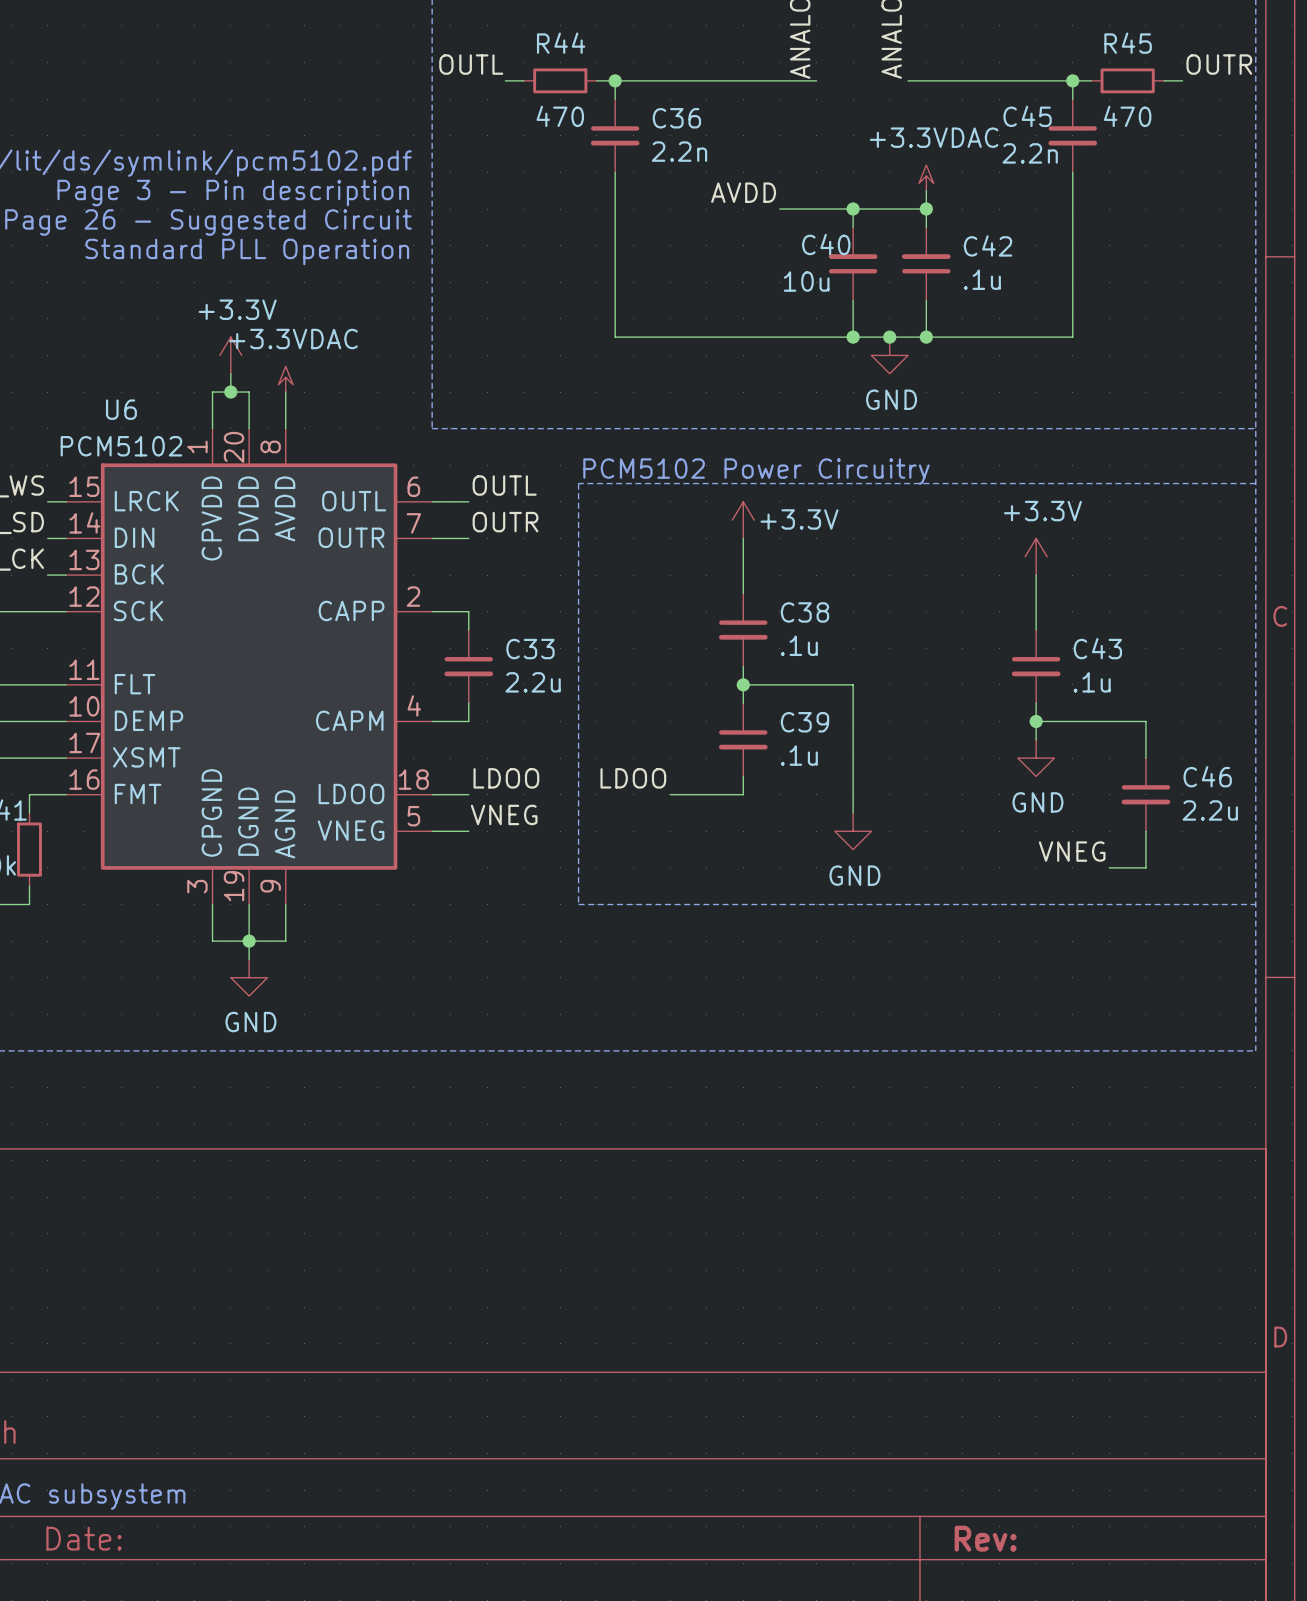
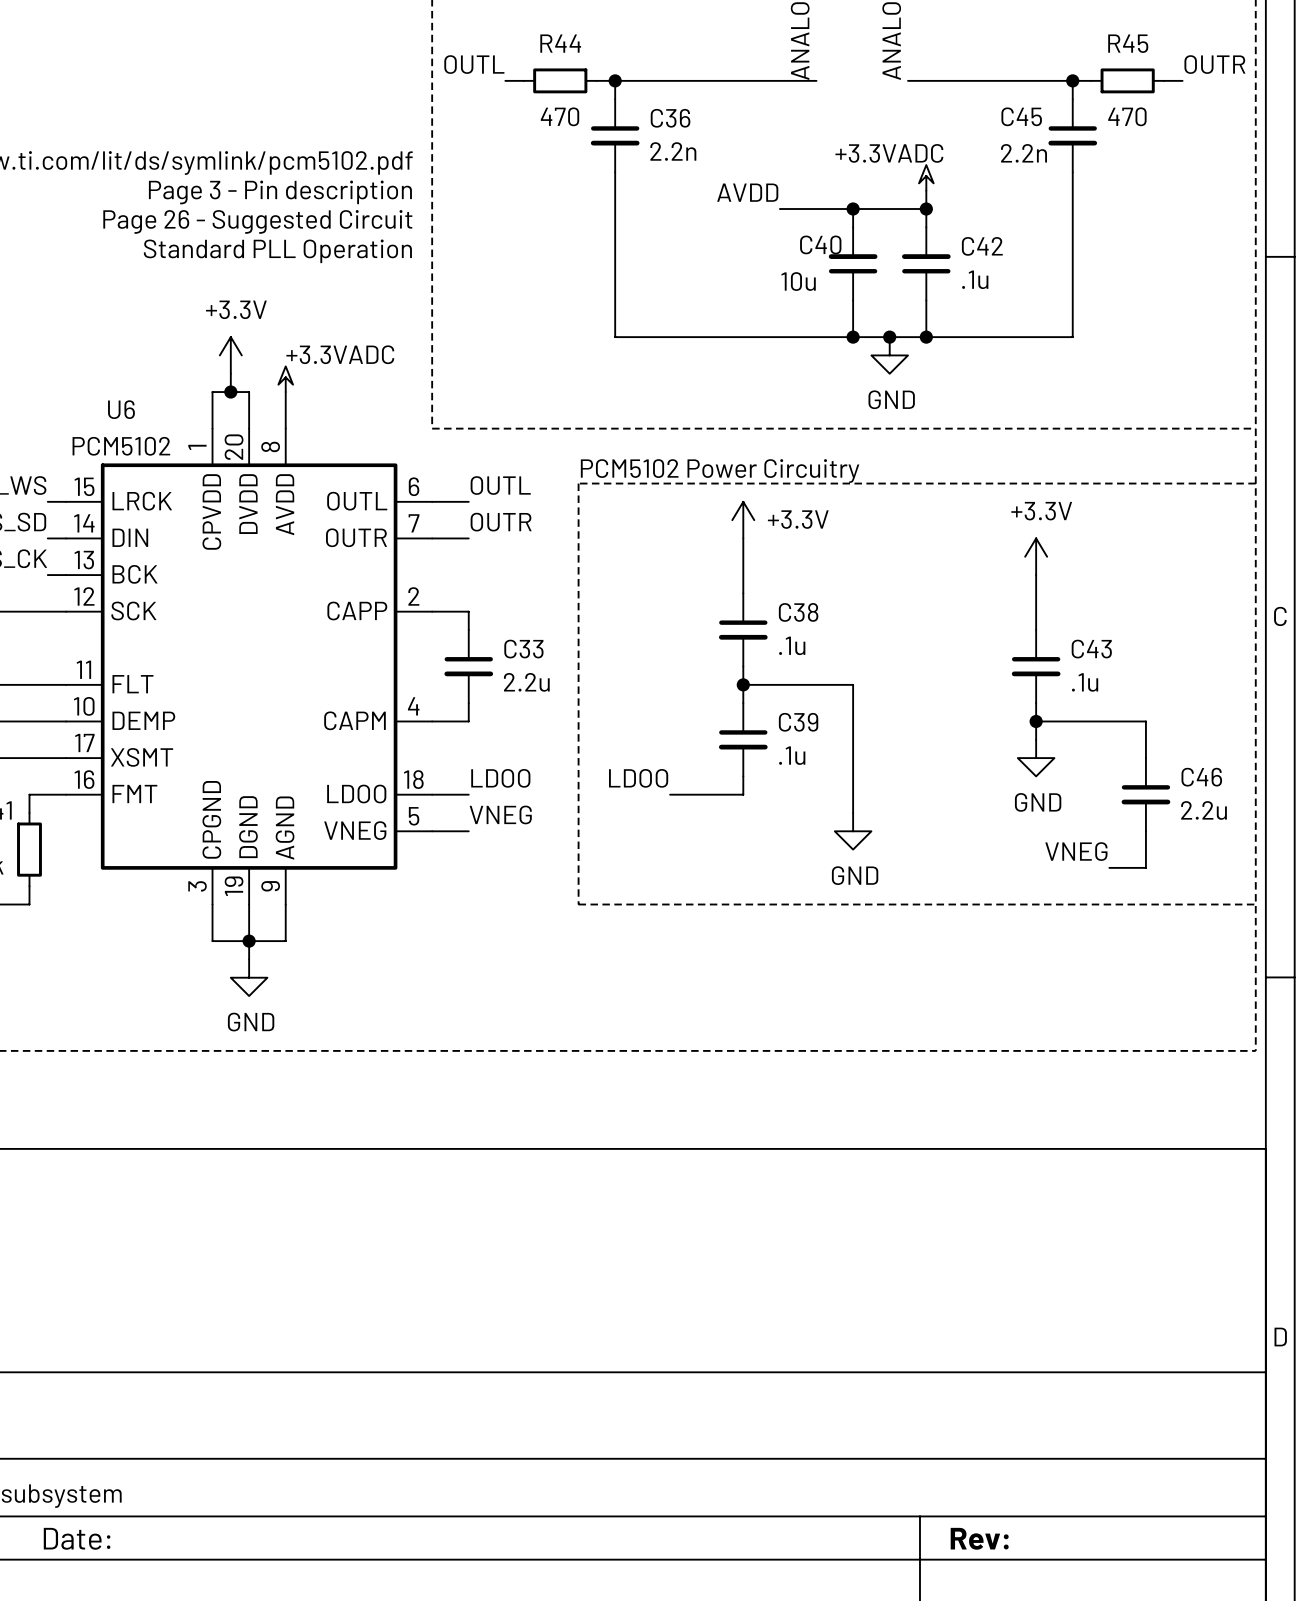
power symbol: +3.3VDAC (926, 177) -> +3.3VADC (926, 177)
power symbol: +3.3VDAC (285, 379) -> +3.3VADC (285, 379)

